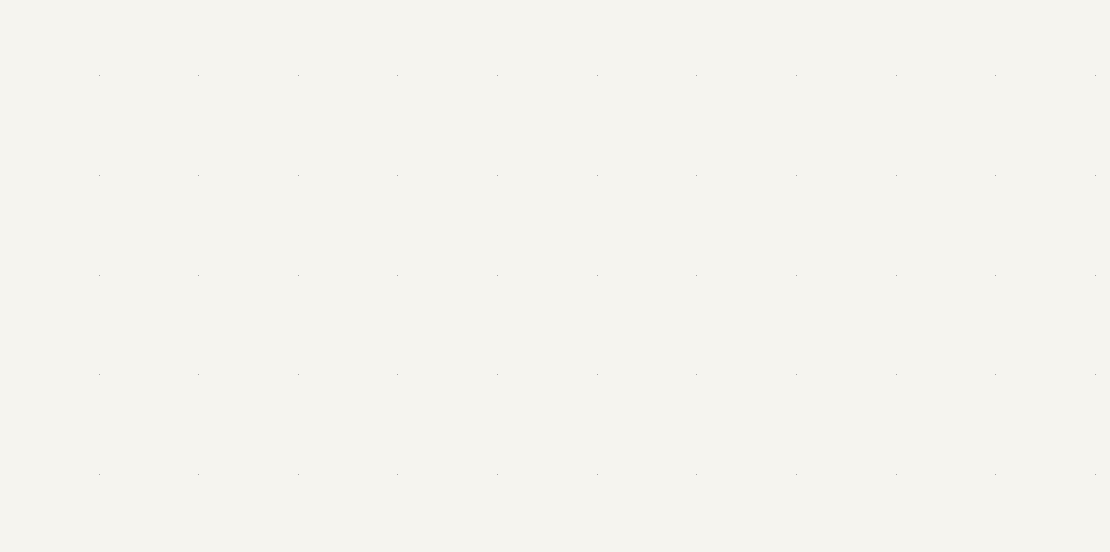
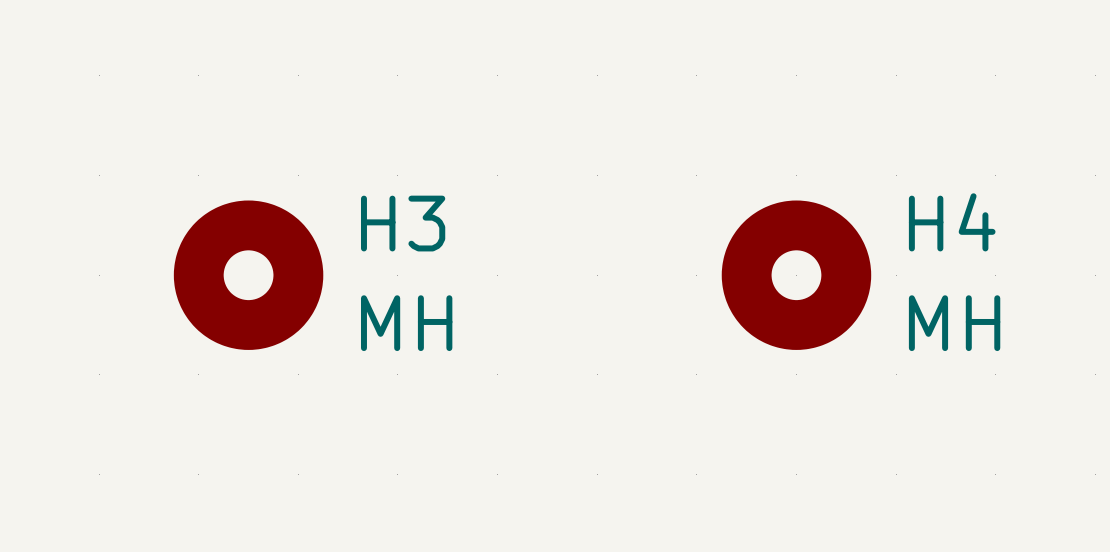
H3: none -> MH (248, 275)
H4: none -> MH (796, 275)

